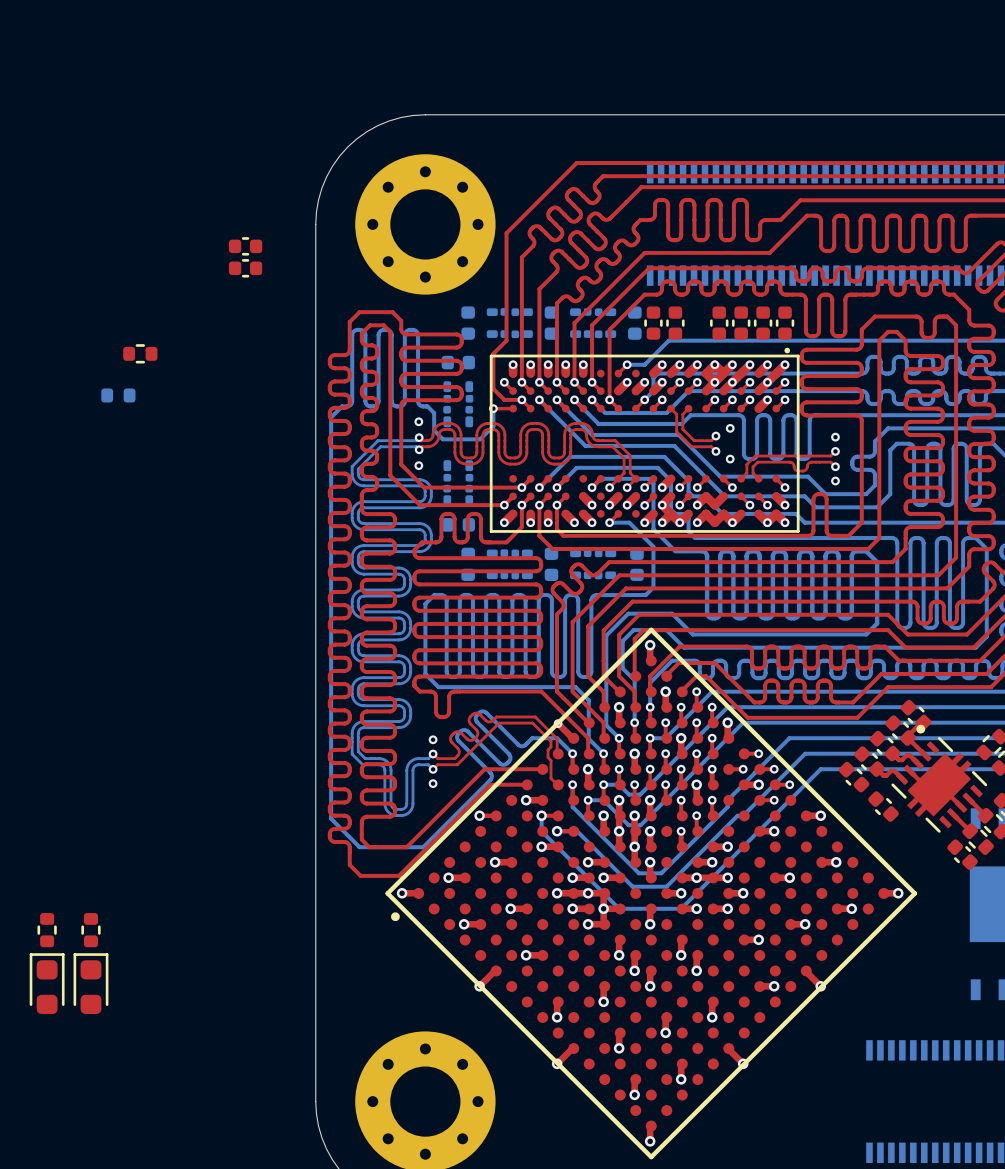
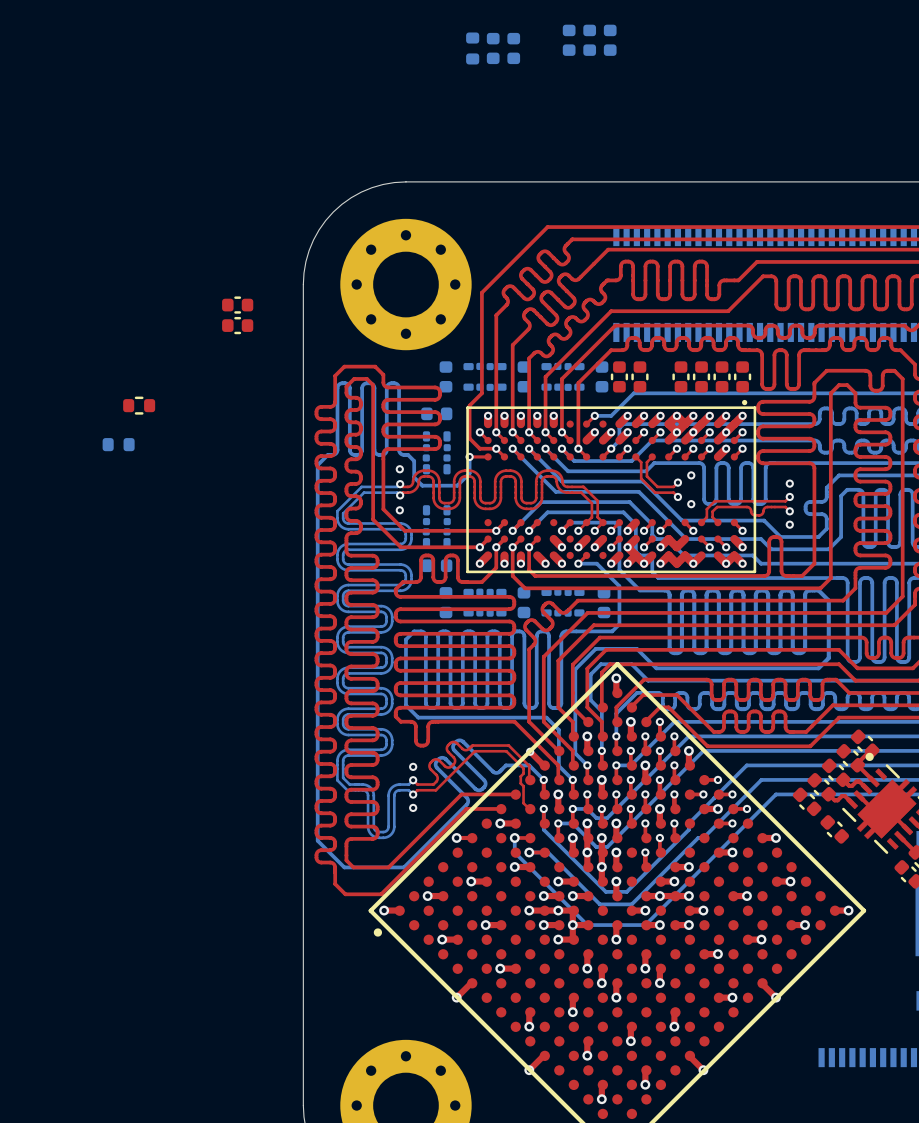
part: (47, 930) -> none
part: (90, 930) -> none
part: (47, 983) -> none
part: (90, 983) -> none

